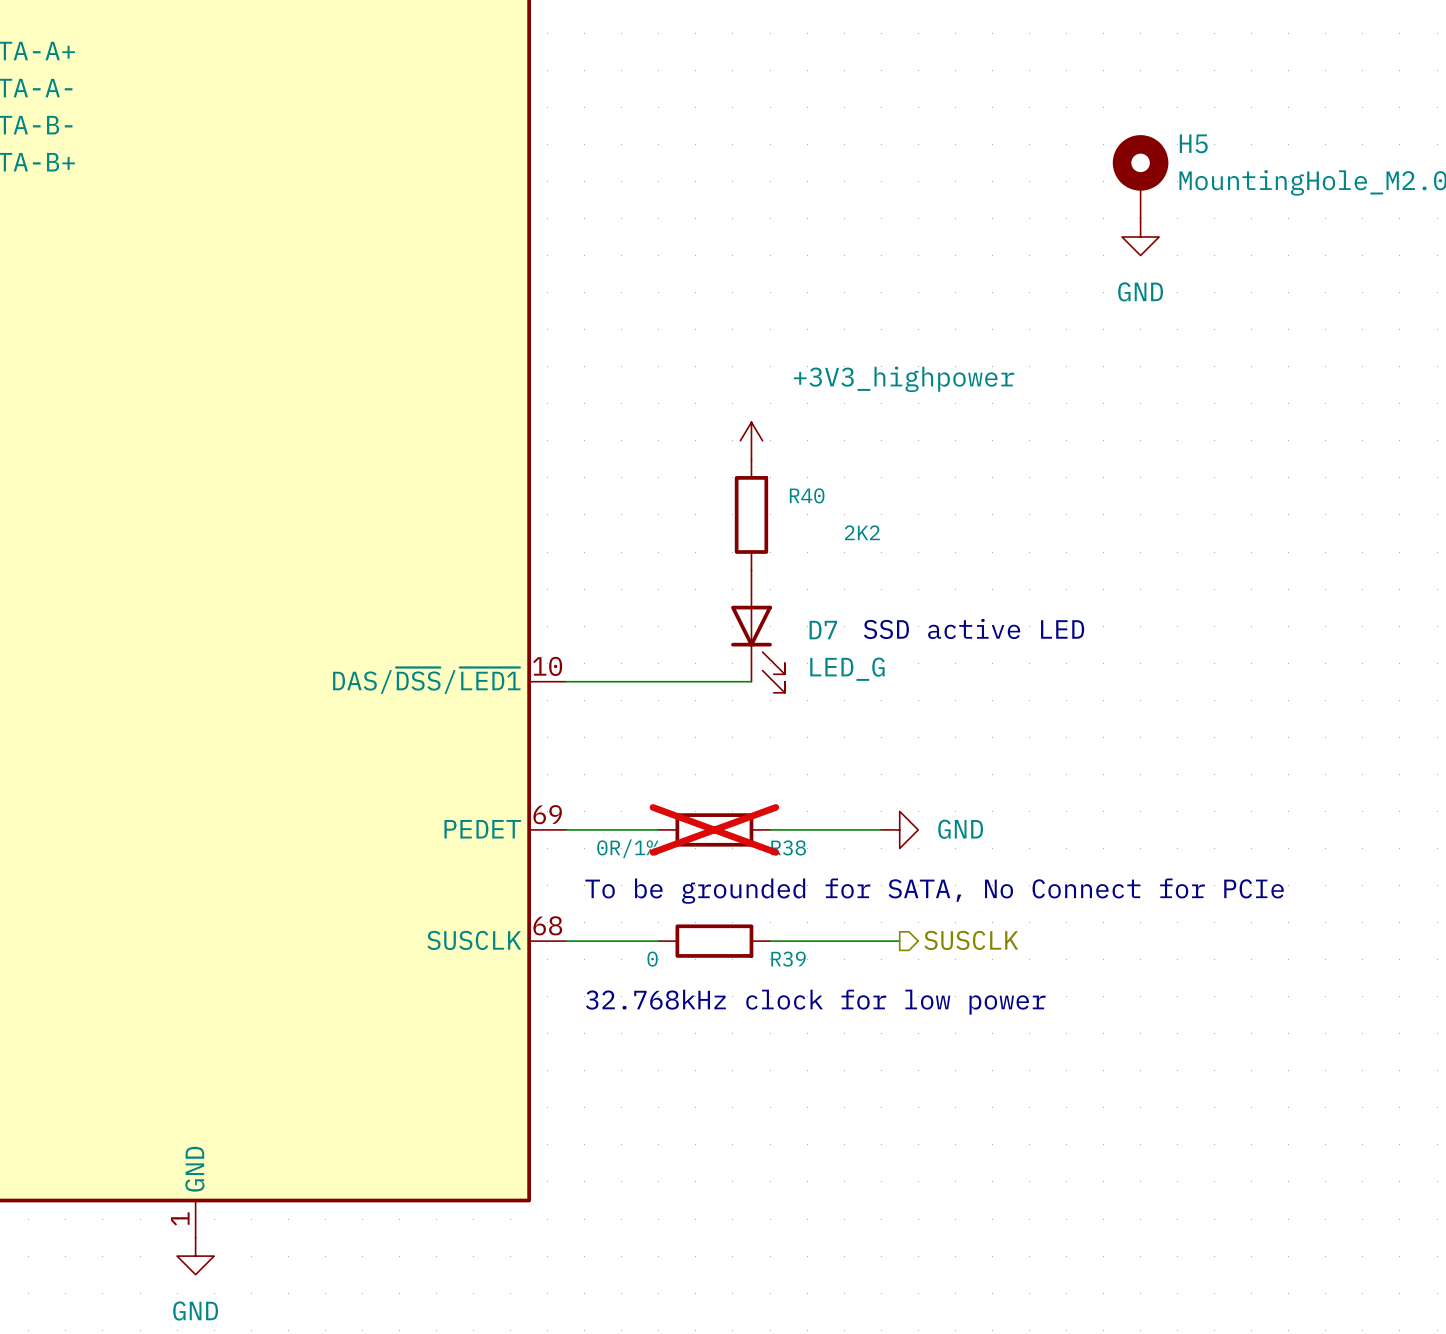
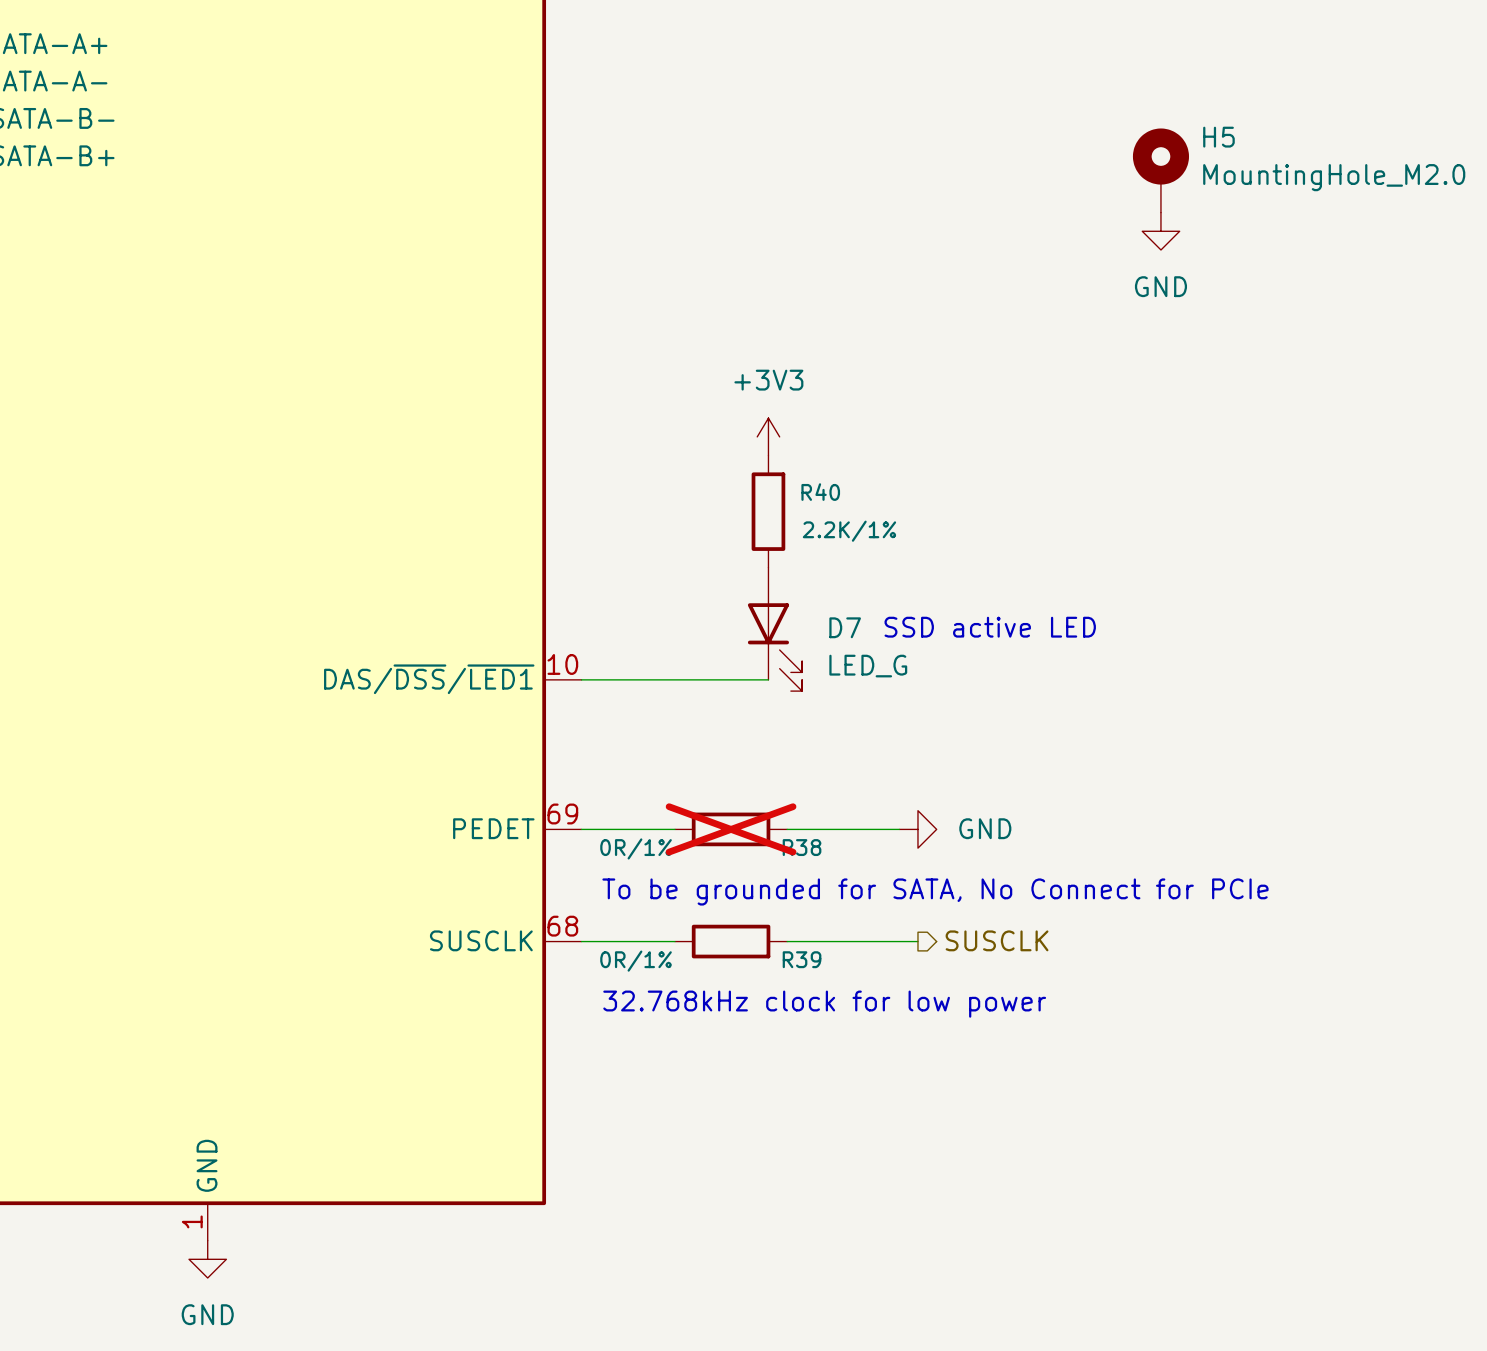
power symbol: +3V3_highpower (751, 440) -> +3V3 (768, 436)
R40 value: 2K2 (862, 532) -> 2.2K/1% (849, 531)
R39 value: 0 (652, 959) -> 0R/1% (636, 961)

